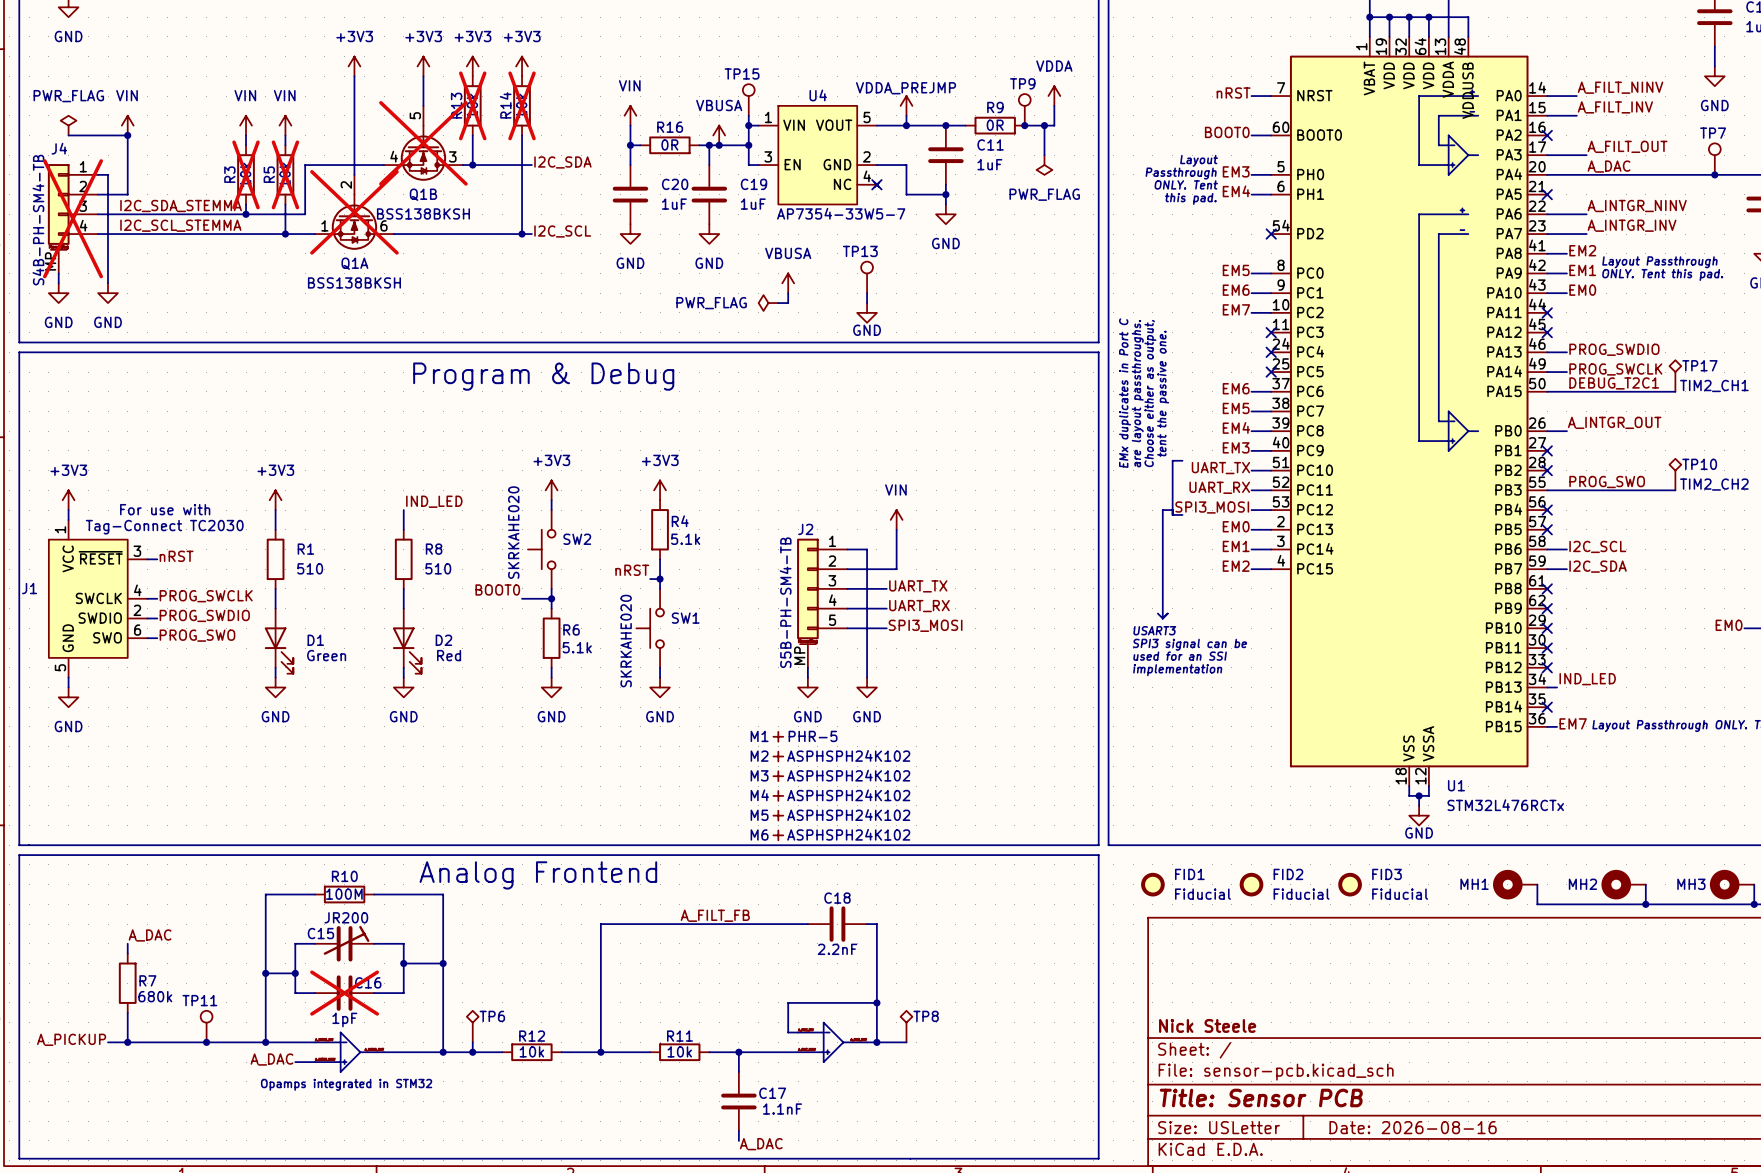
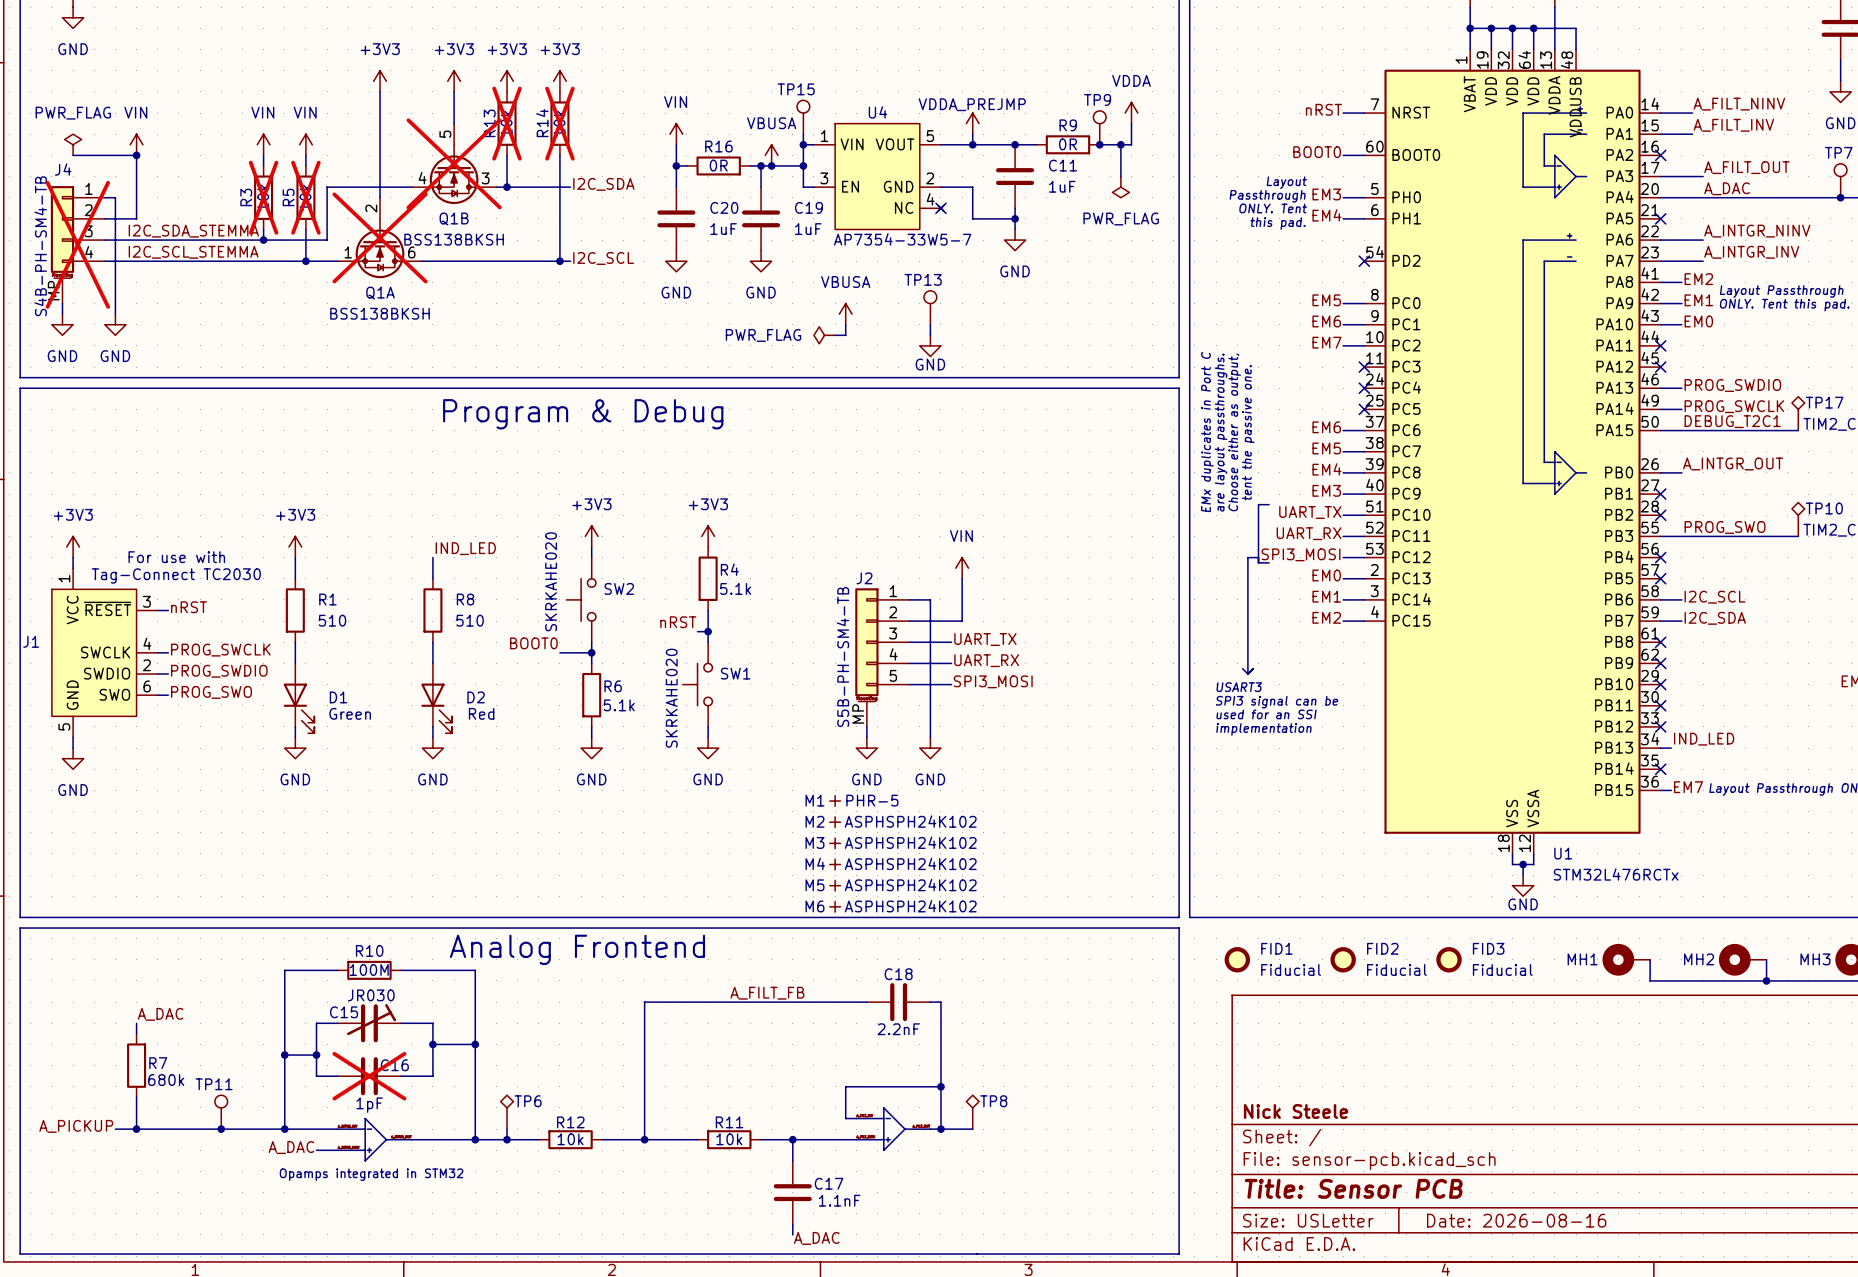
C15 value: JR200 (346, 917) -> JR030 (371, 995)

